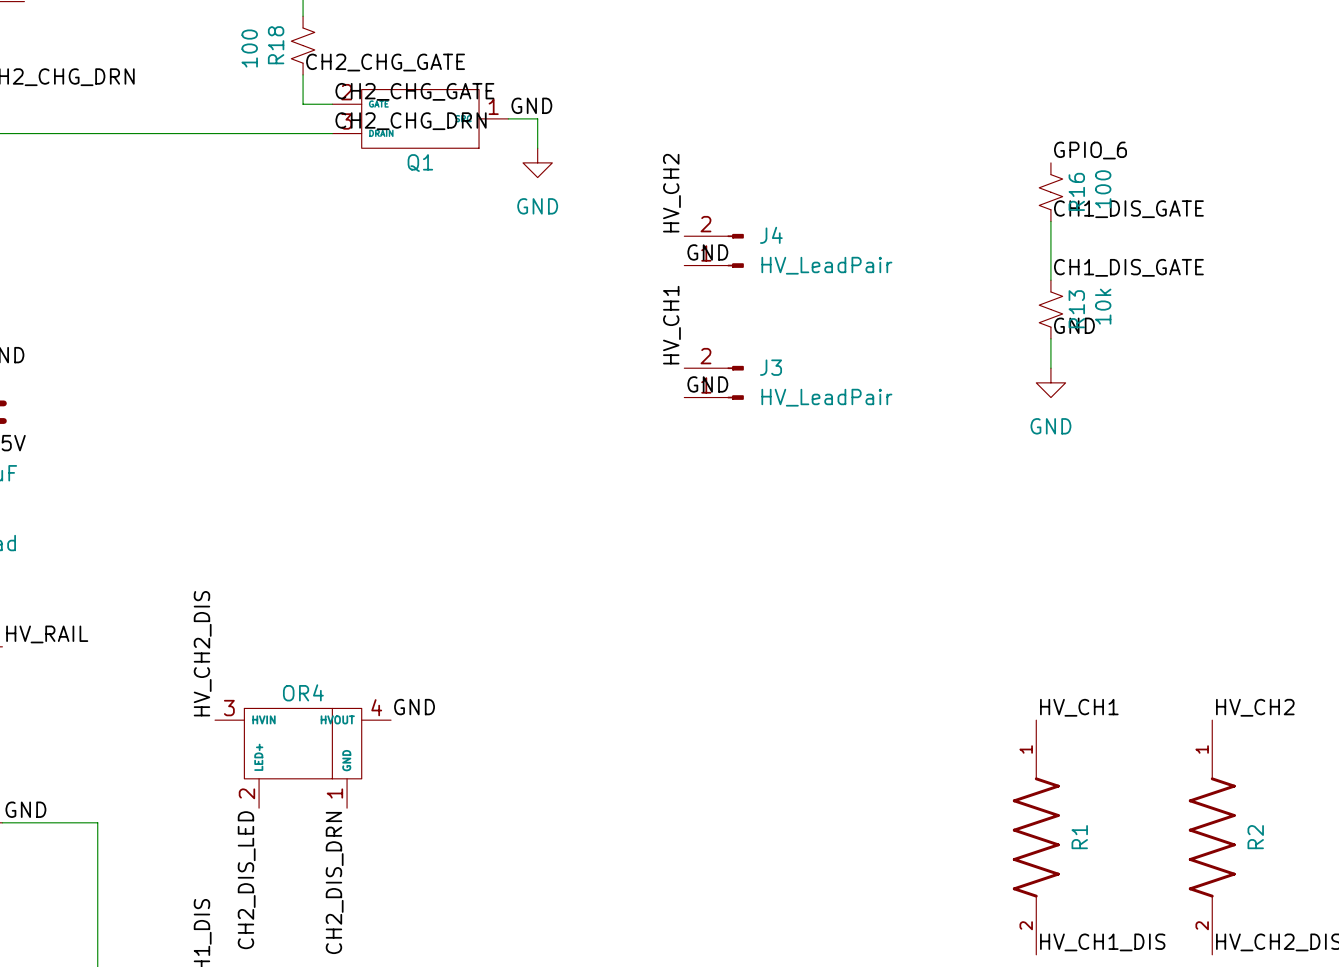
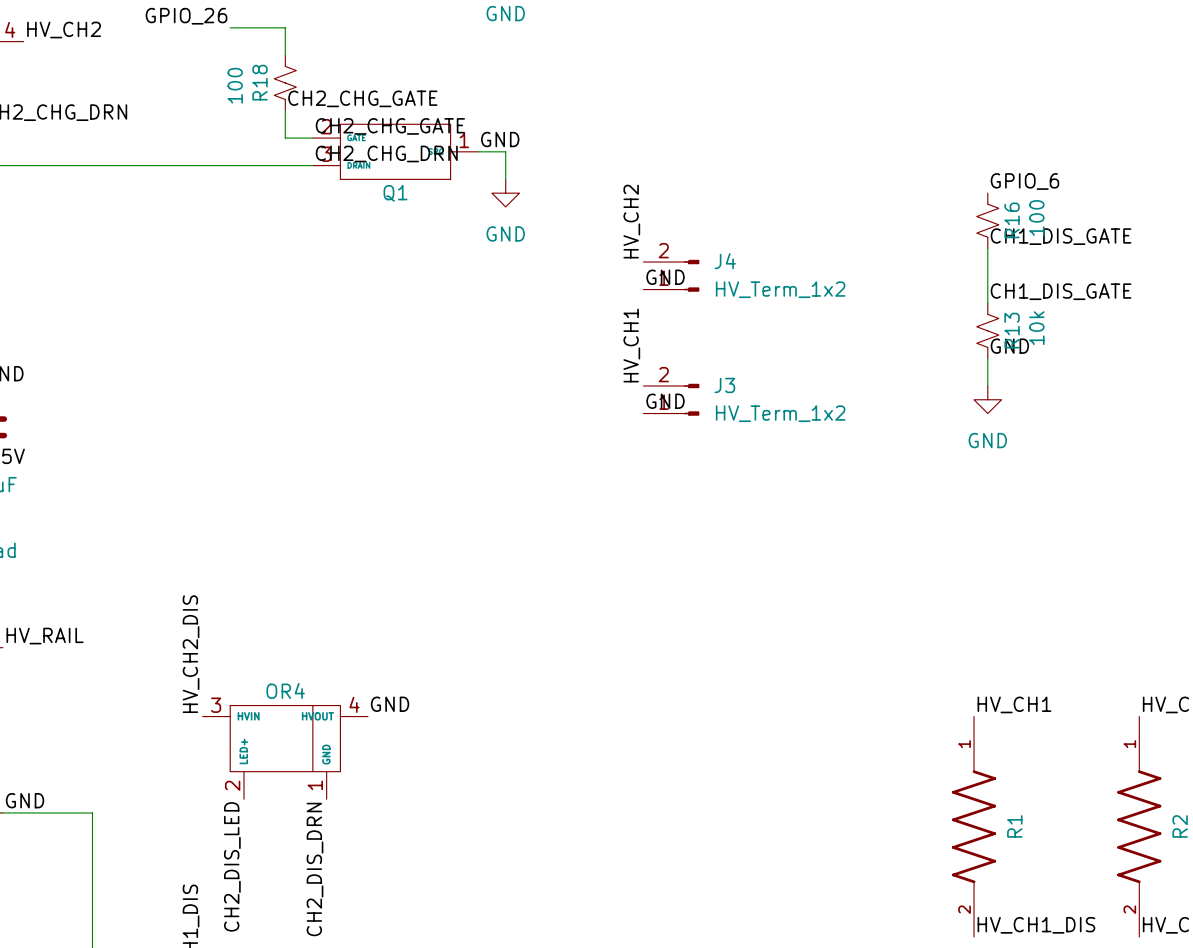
J4 value: HV_LeadPair (826, 265) -> HV_Term_1x2 (780, 289)
J3 value: HV_LeadPair (826, 397) -> HV_Term_1x2 (780, 413)

